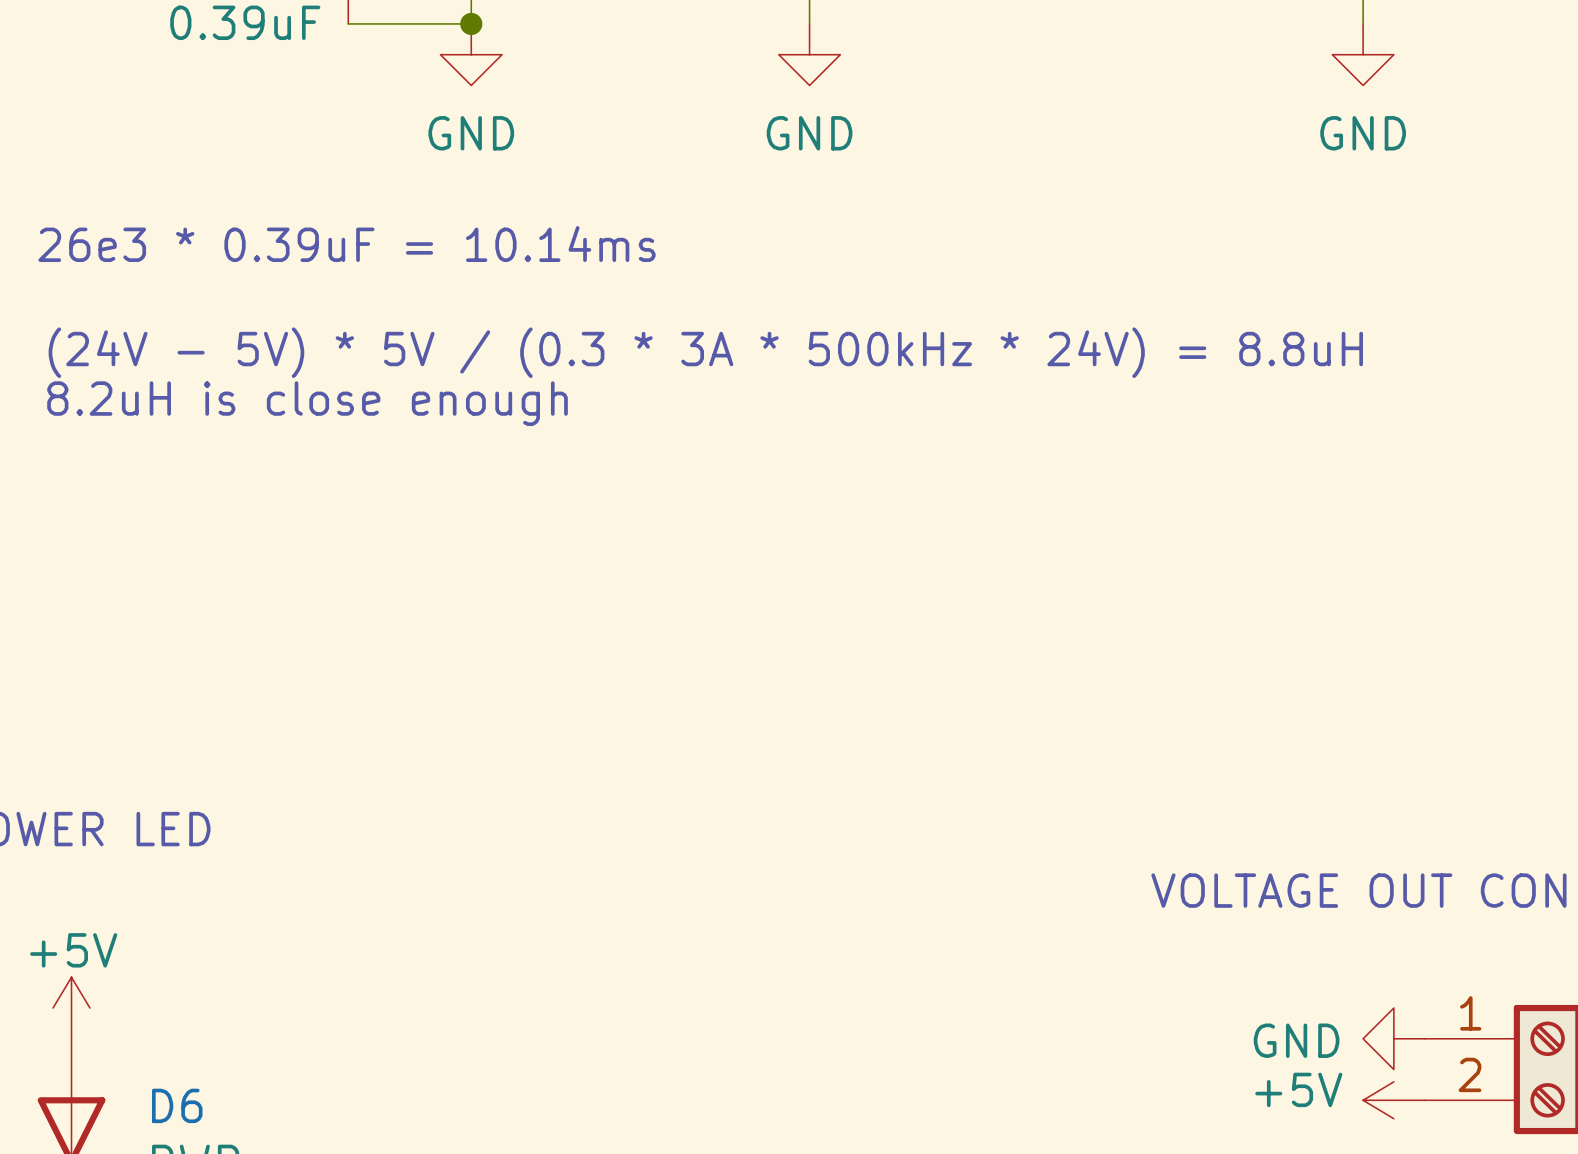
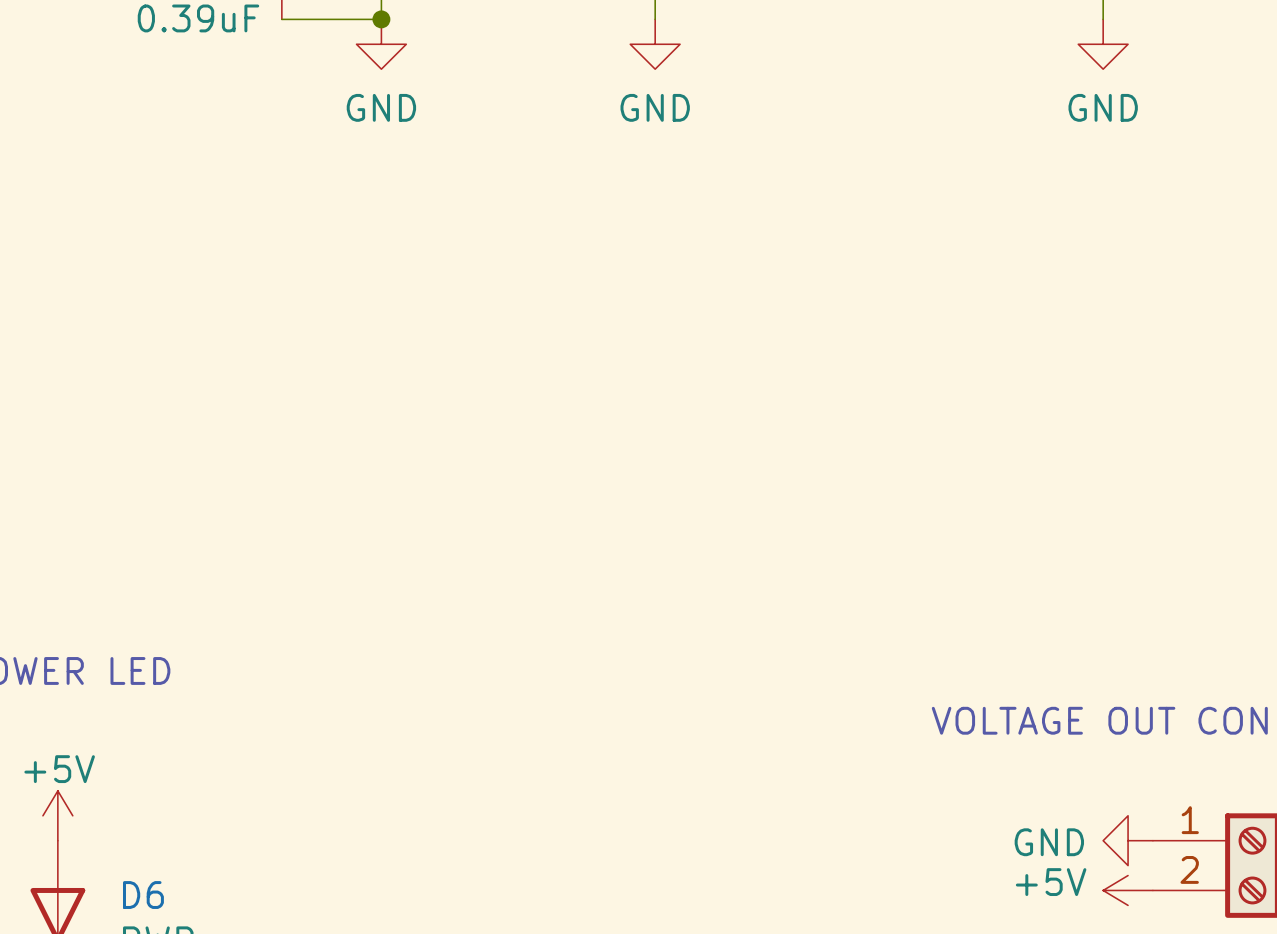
text: 26e3 * 0.39uF = 10.14ms (347, 244) -> none
text: (24V - 5V) * 5V / (0.3 * 3A * 500kHz * 24V) = 8.8uH (705, 352) -> none
text: 8.2uH is close enough (307, 403) -> none

